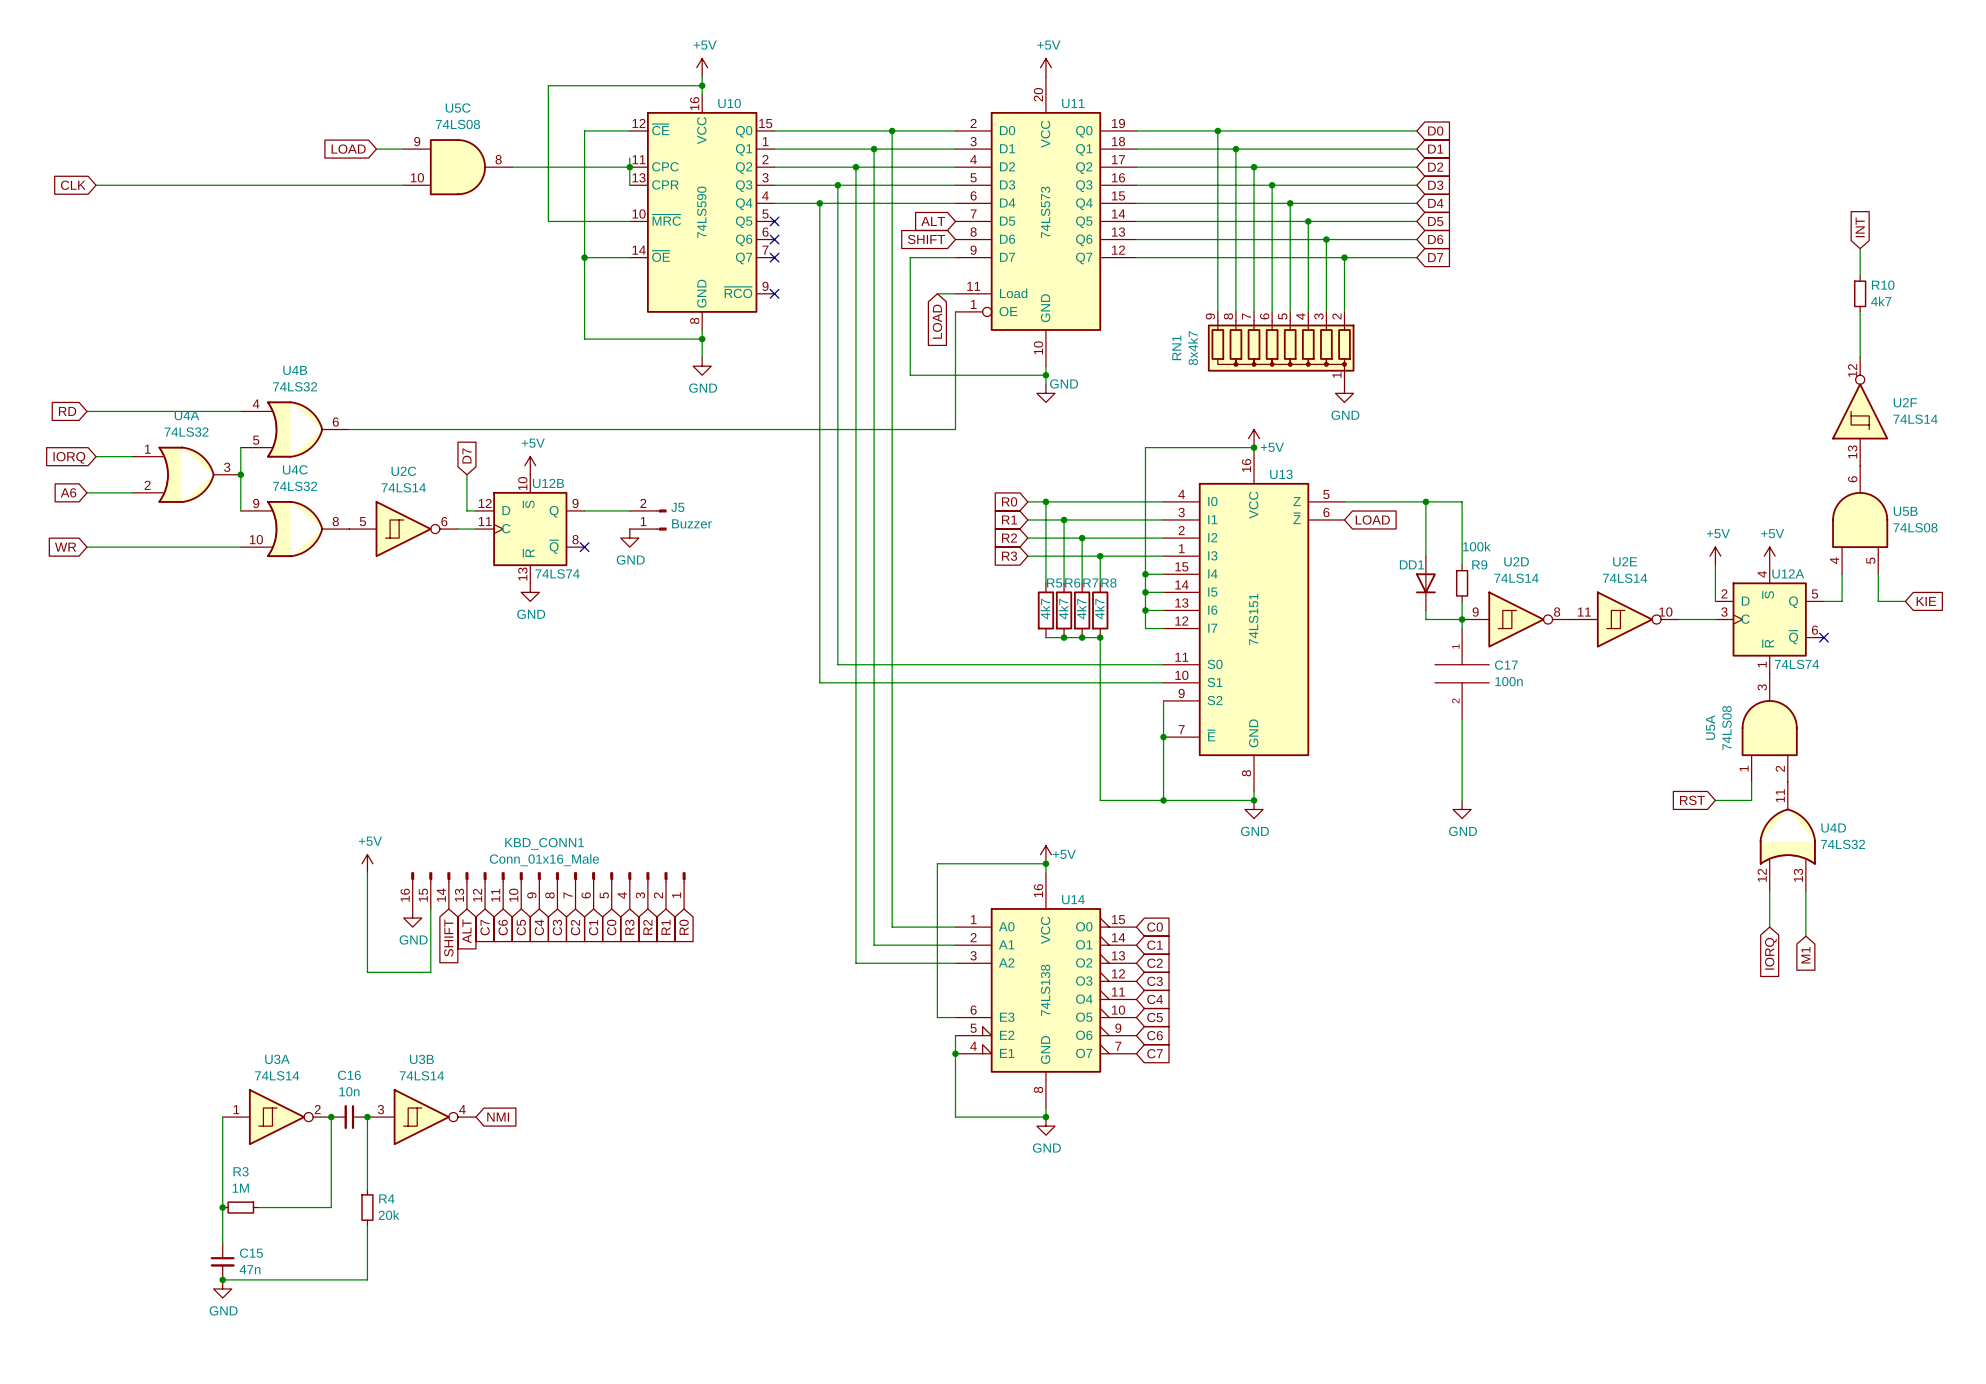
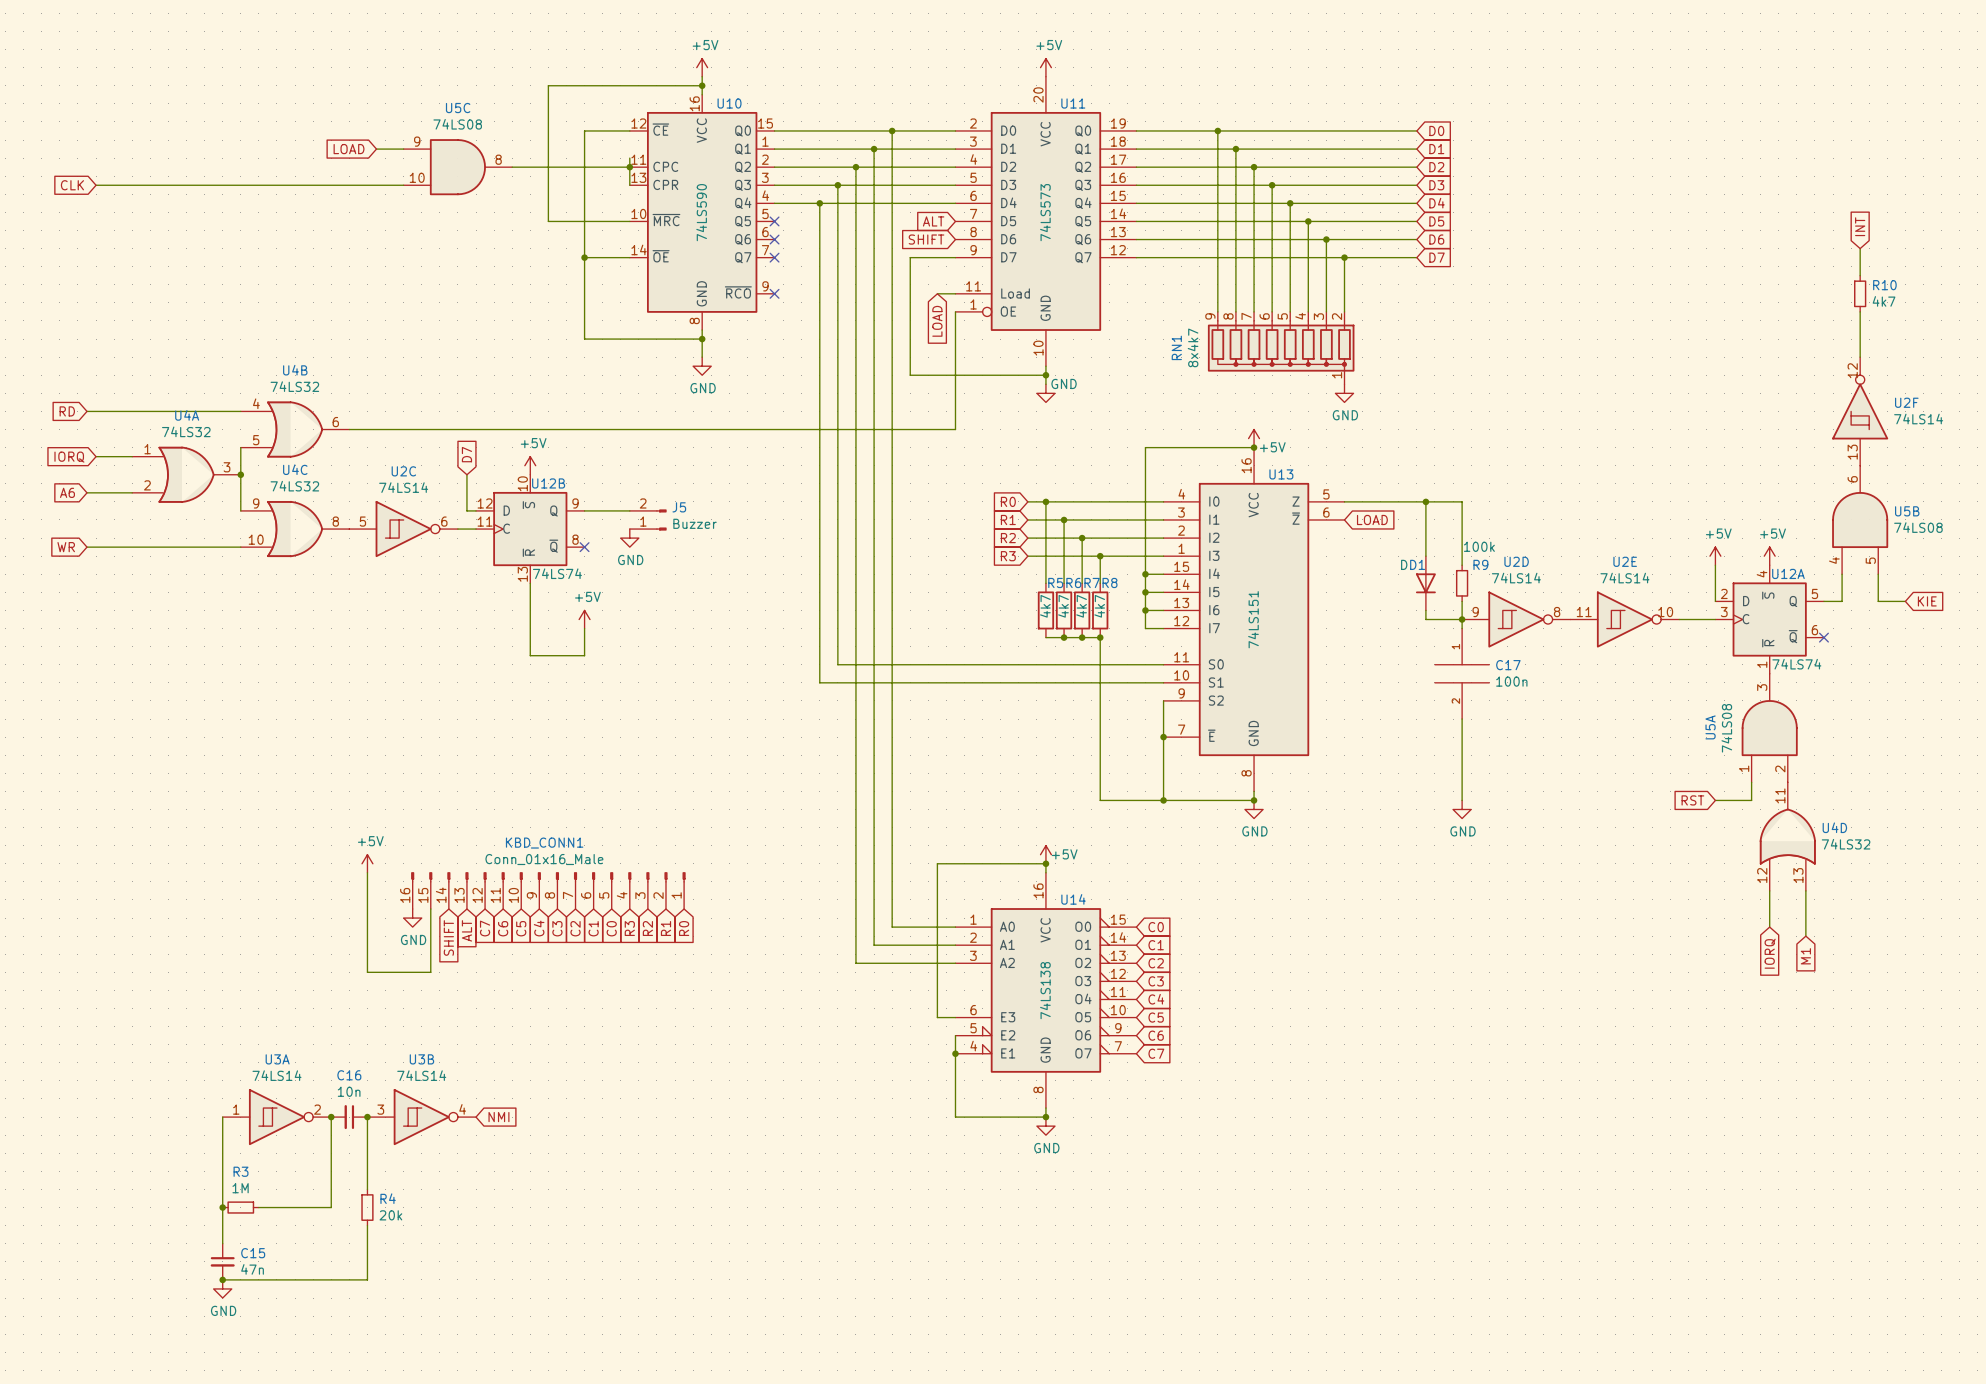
wire: none -> (530, 583) (530, 655) (584, 655) (584, 628)
power symbol: GND (530, 592) -> none
power symbol: none -> +5V (584, 619)

